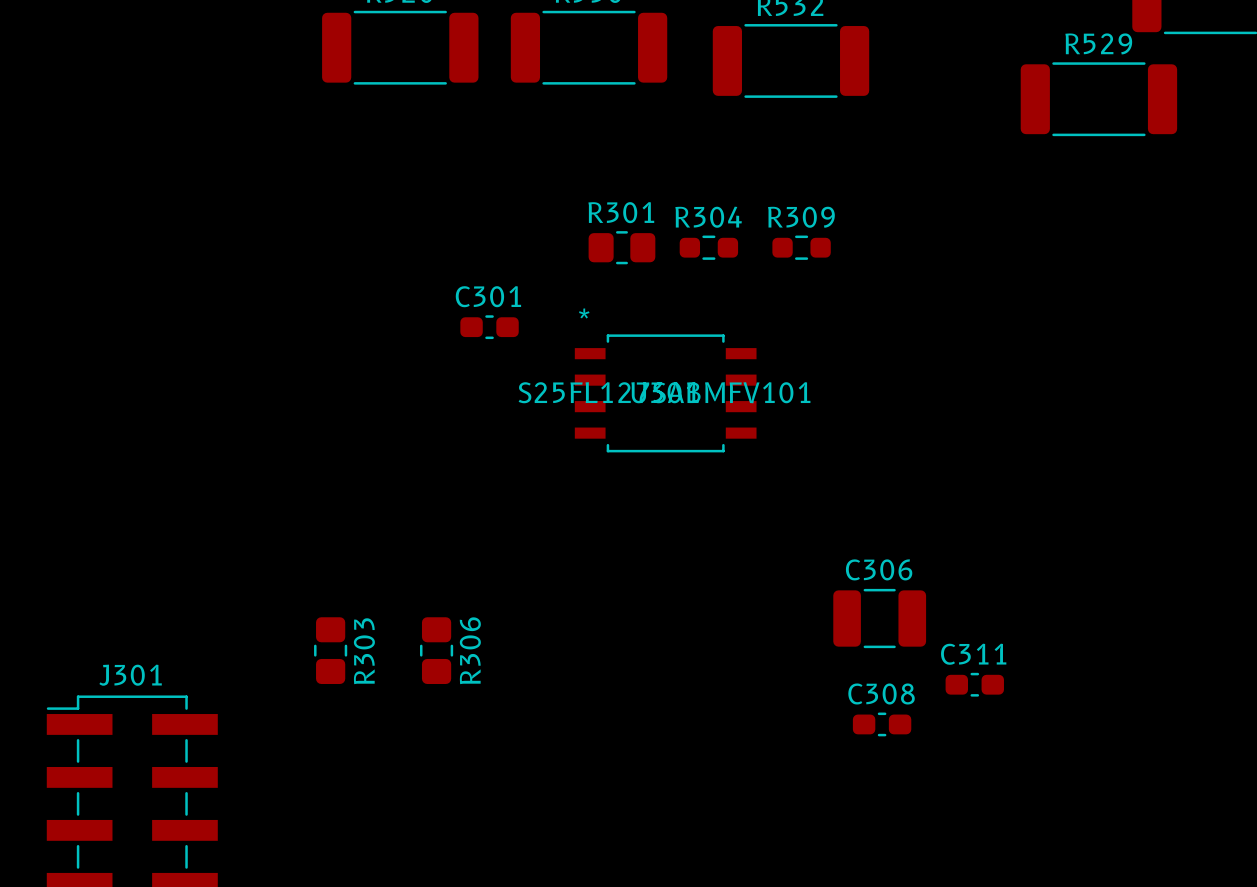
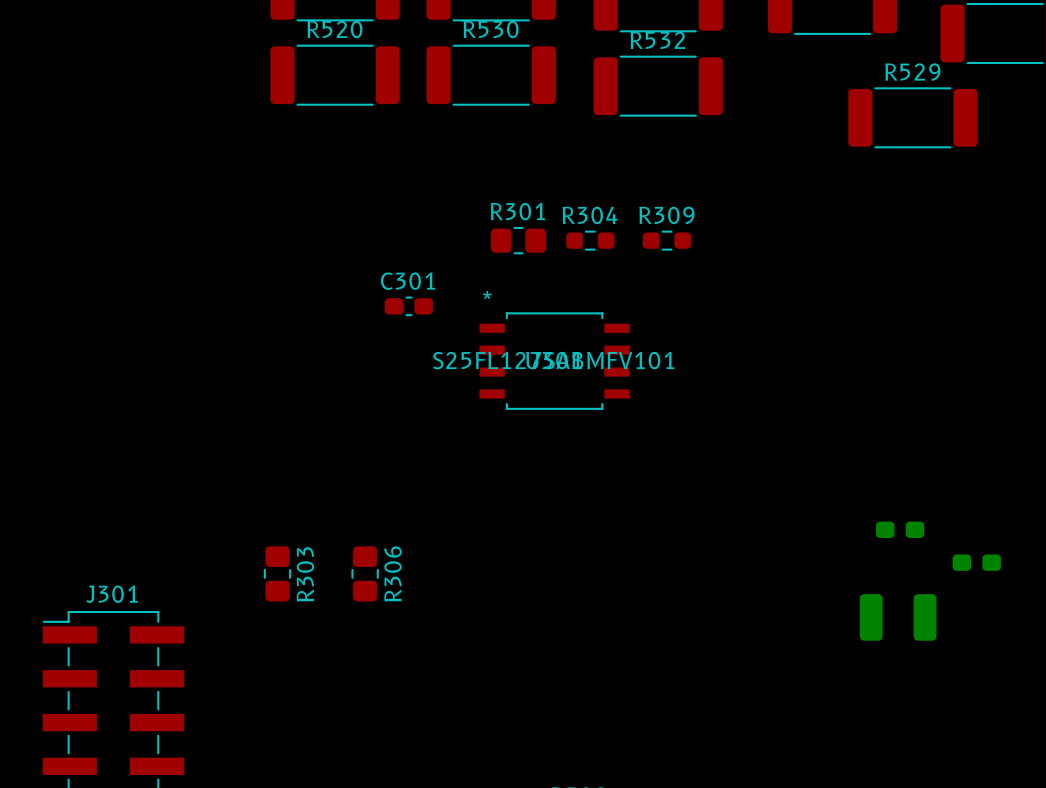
C306 side: top (879, 618) -> bottom (898, 617)
C311 side: top (974, 684) -> bottom (976, 562)
C308 side: top (882, 724) -> bottom (900, 529)

